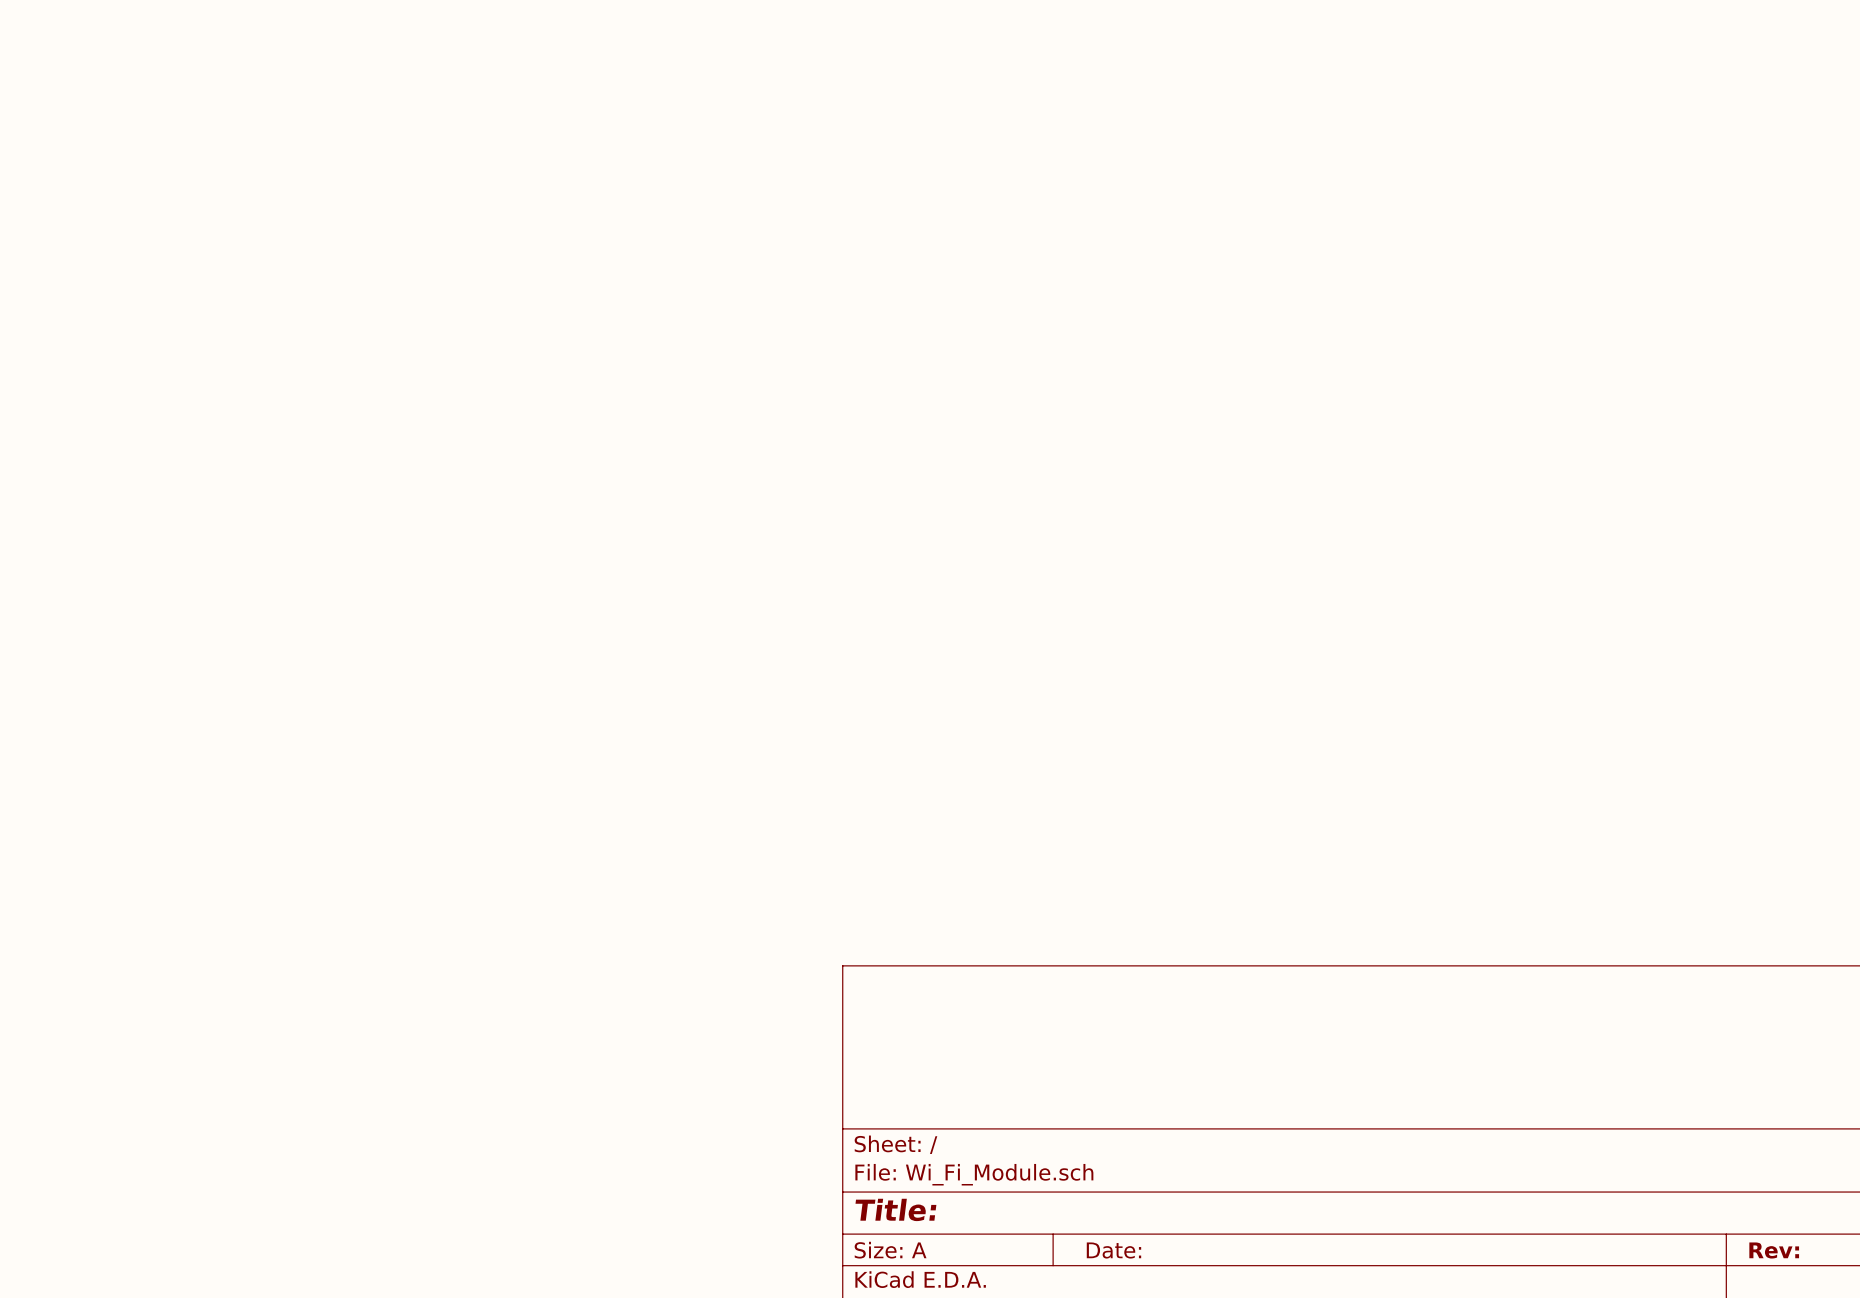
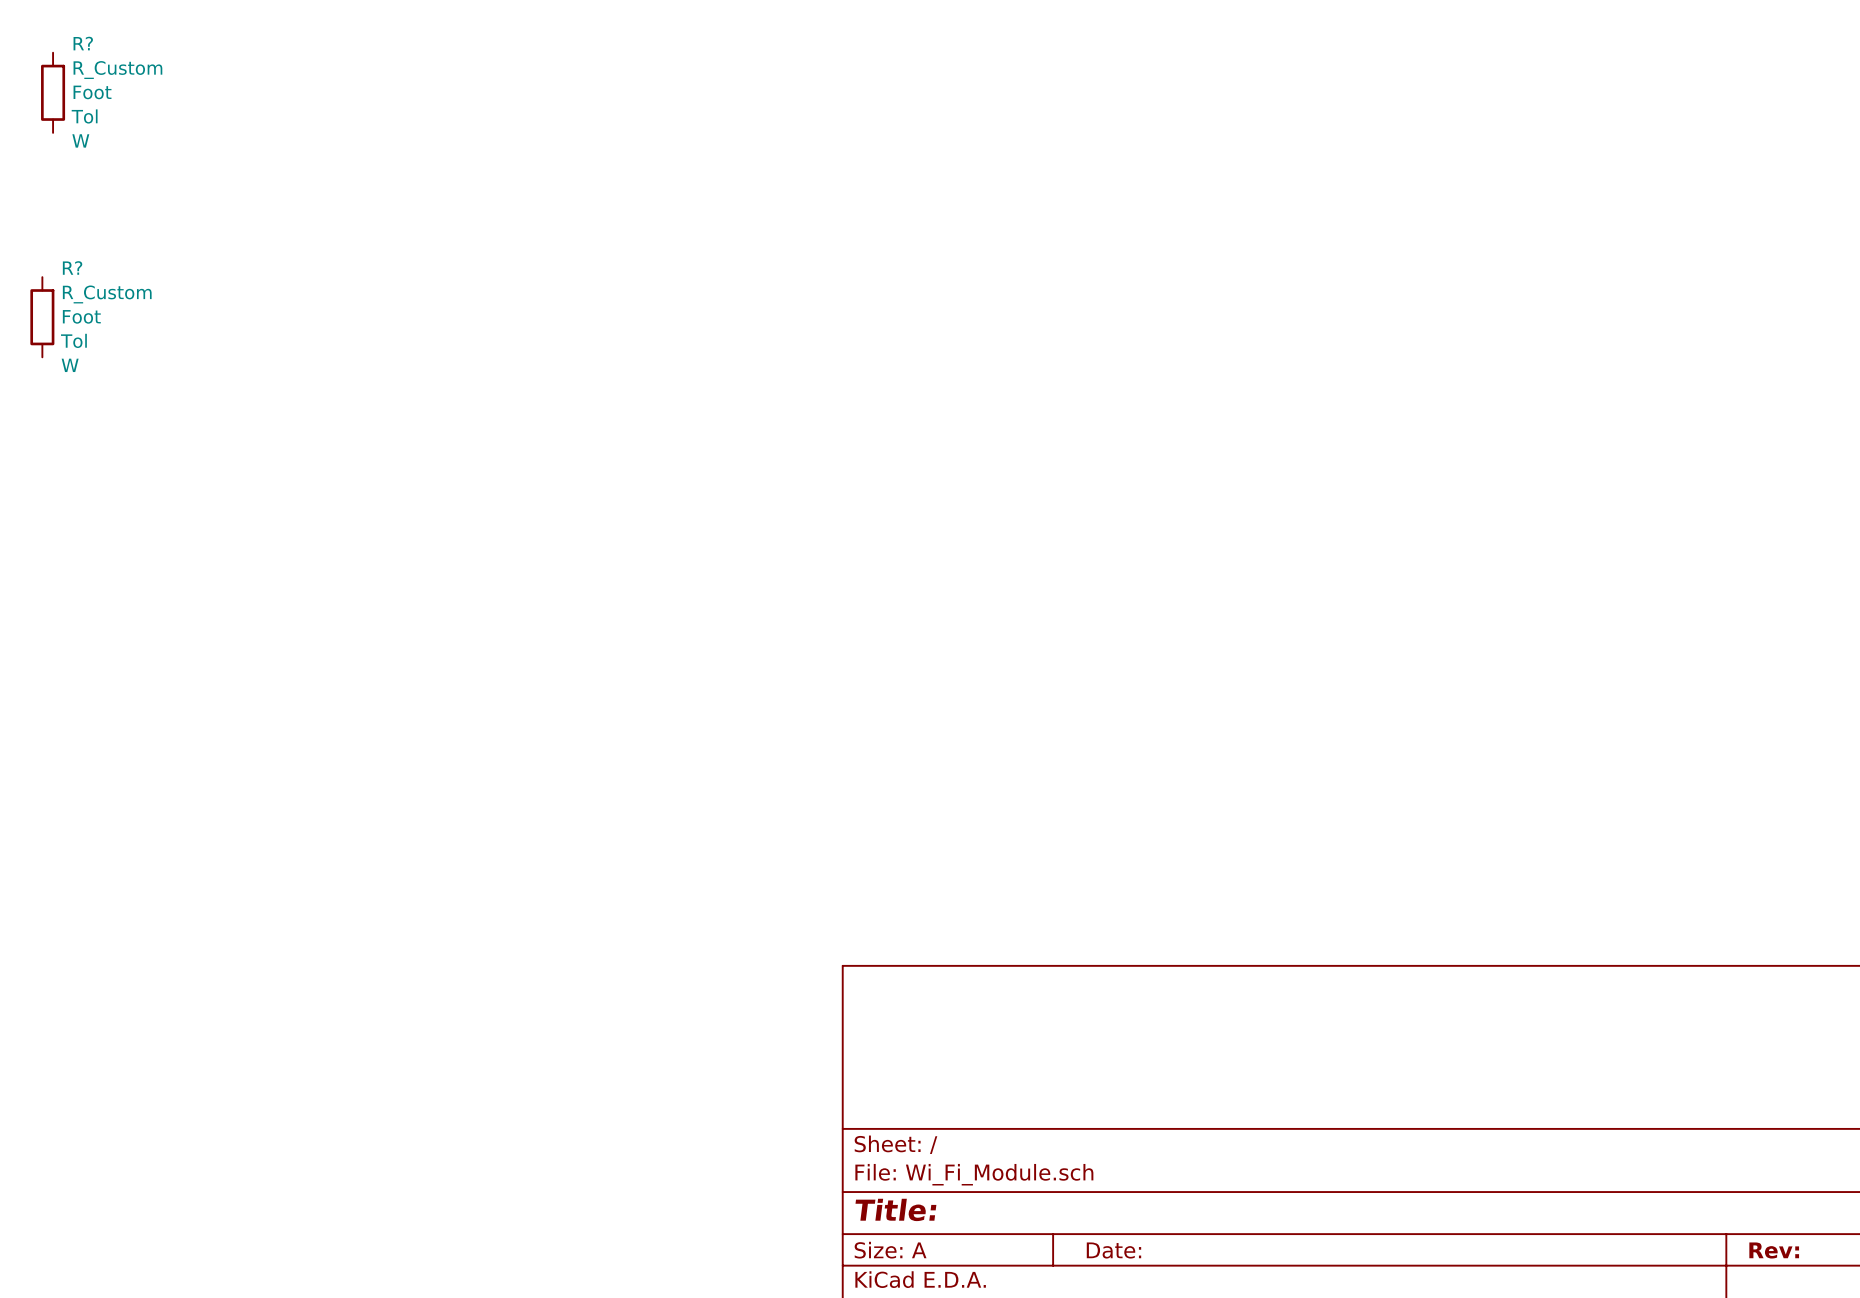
R?: none -> R_Custom (53, 92)
R?: none -> R_Custom (42, 317)

